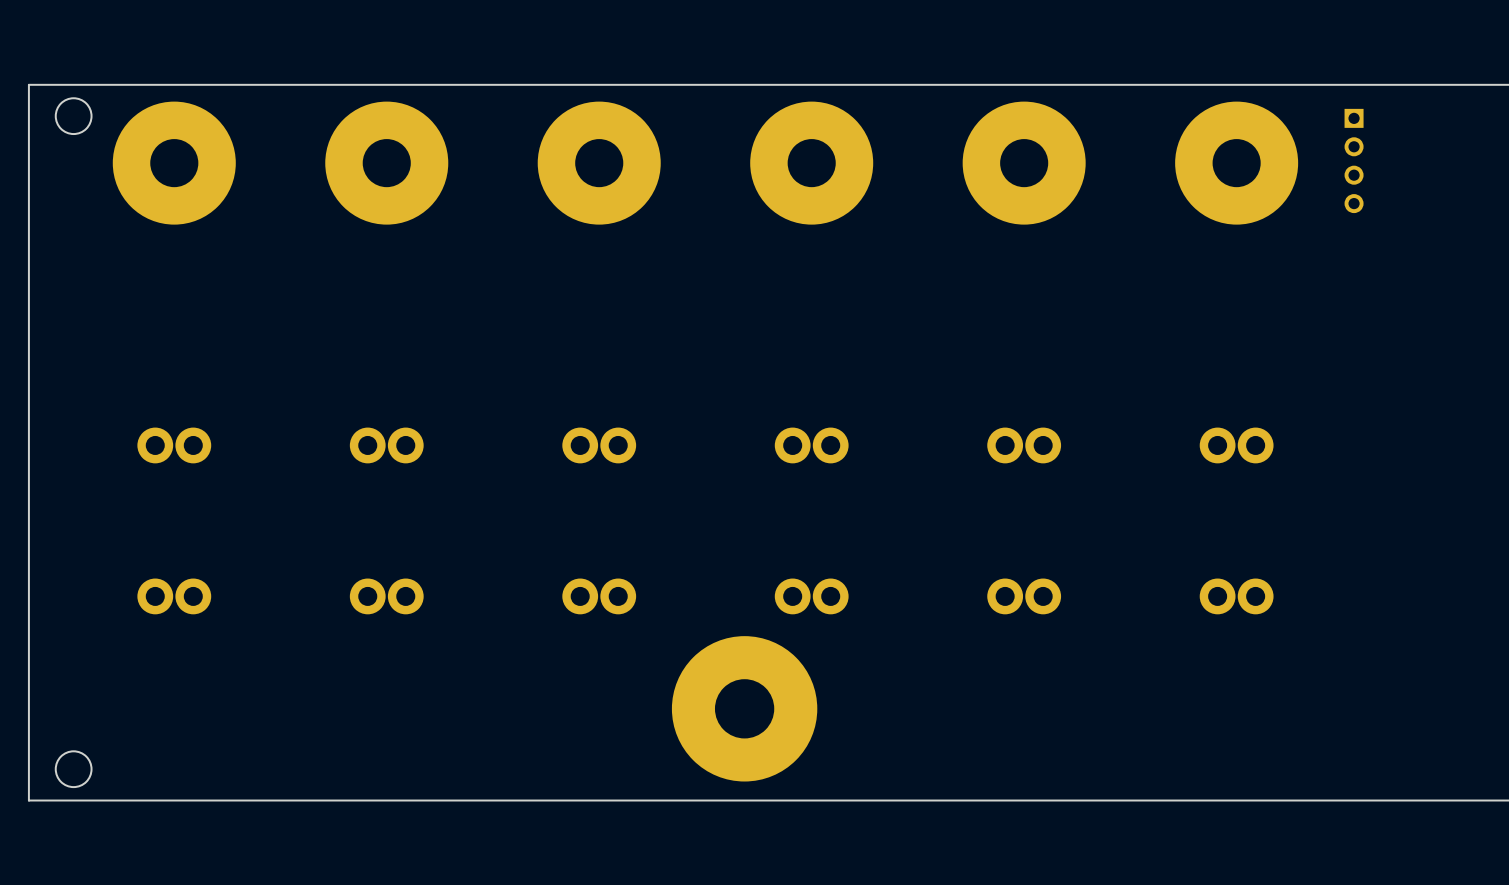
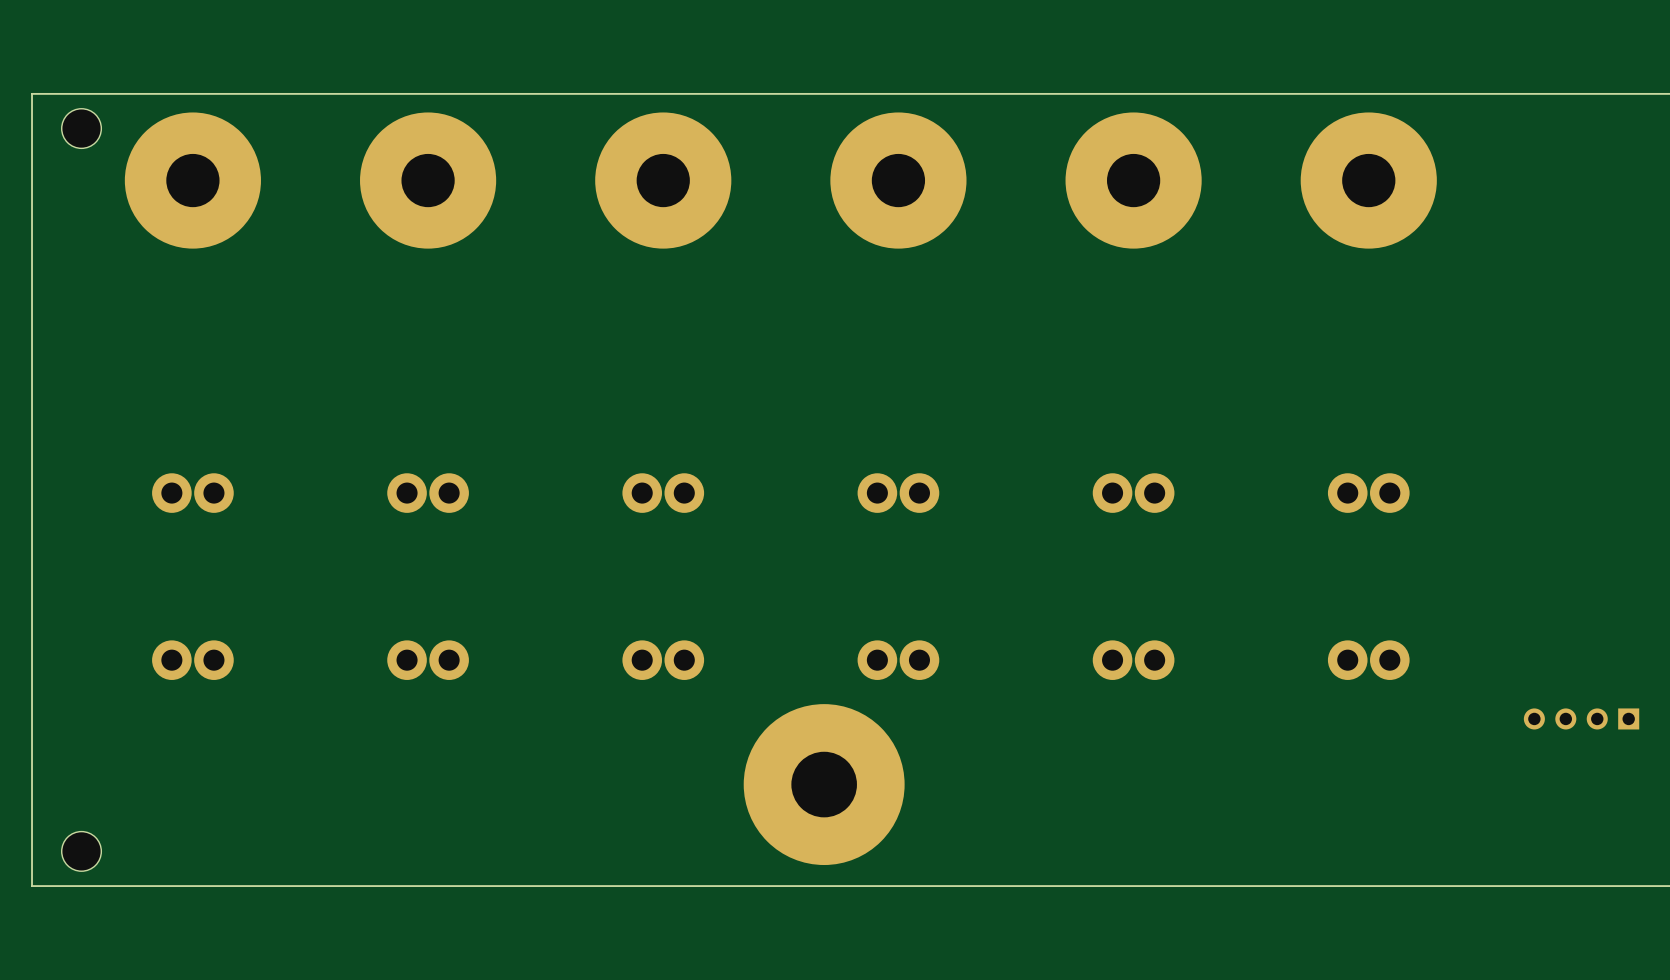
part: (1354, 160) -> none
part: none -> (1581, 718)

